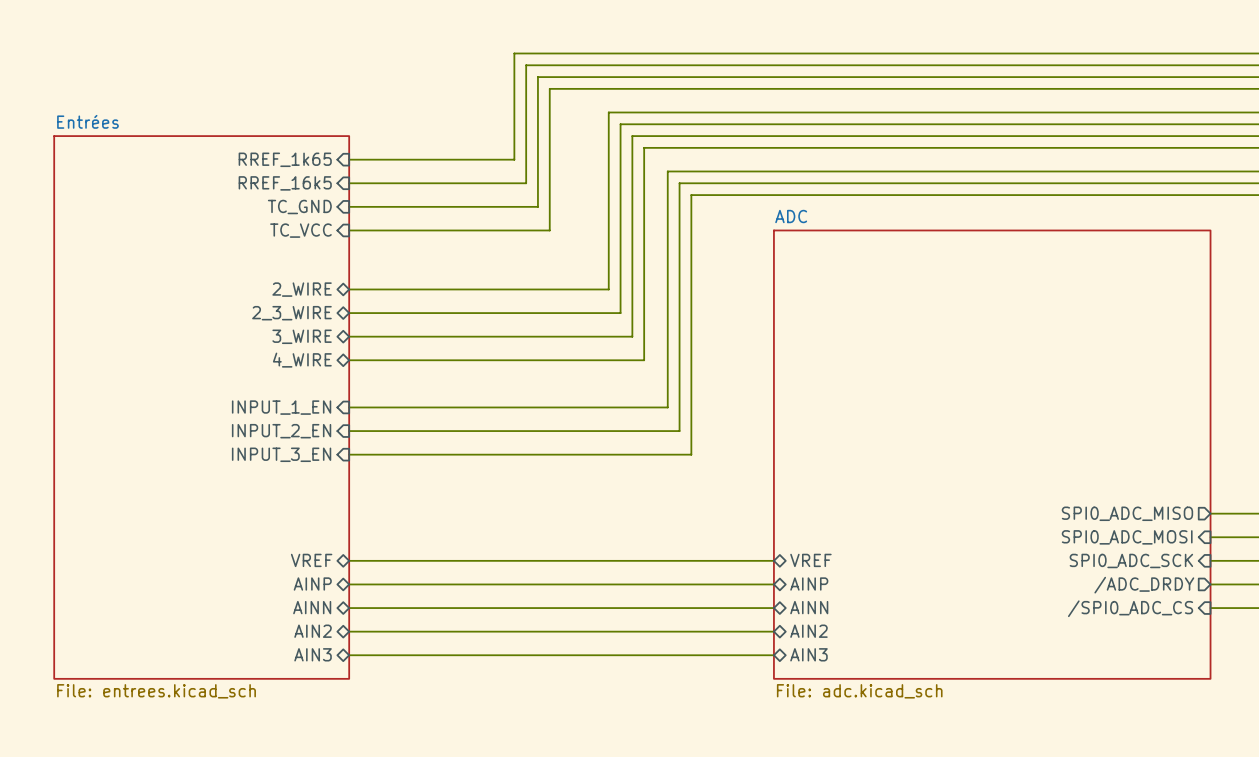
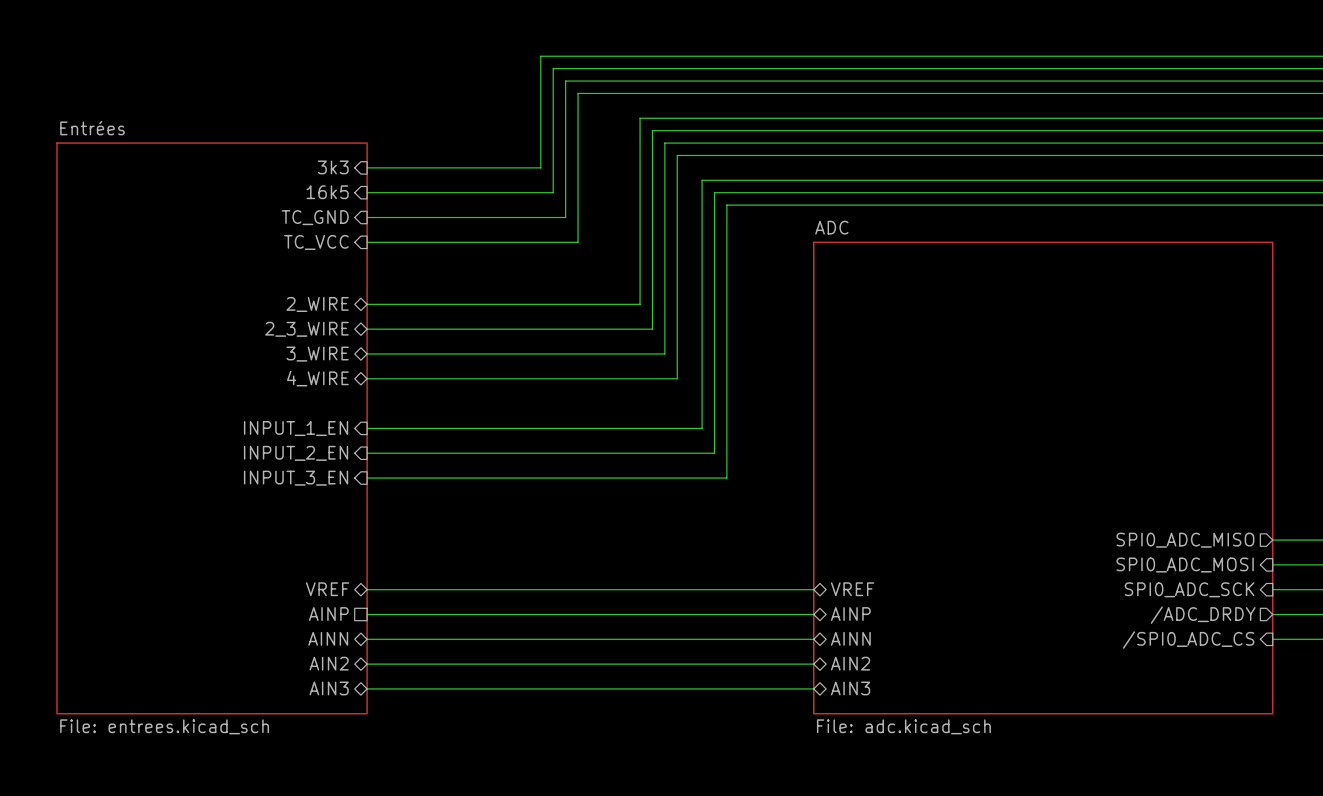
sheet pin: RREF_1k65 (285, 159) -> 3k3 (333, 167)
sheet pin: RREF_16k5 (285, 183) -> 16k5 (327, 192)
sheet pin shape: bidirectional (312, 584) -> passive (328, 614)

